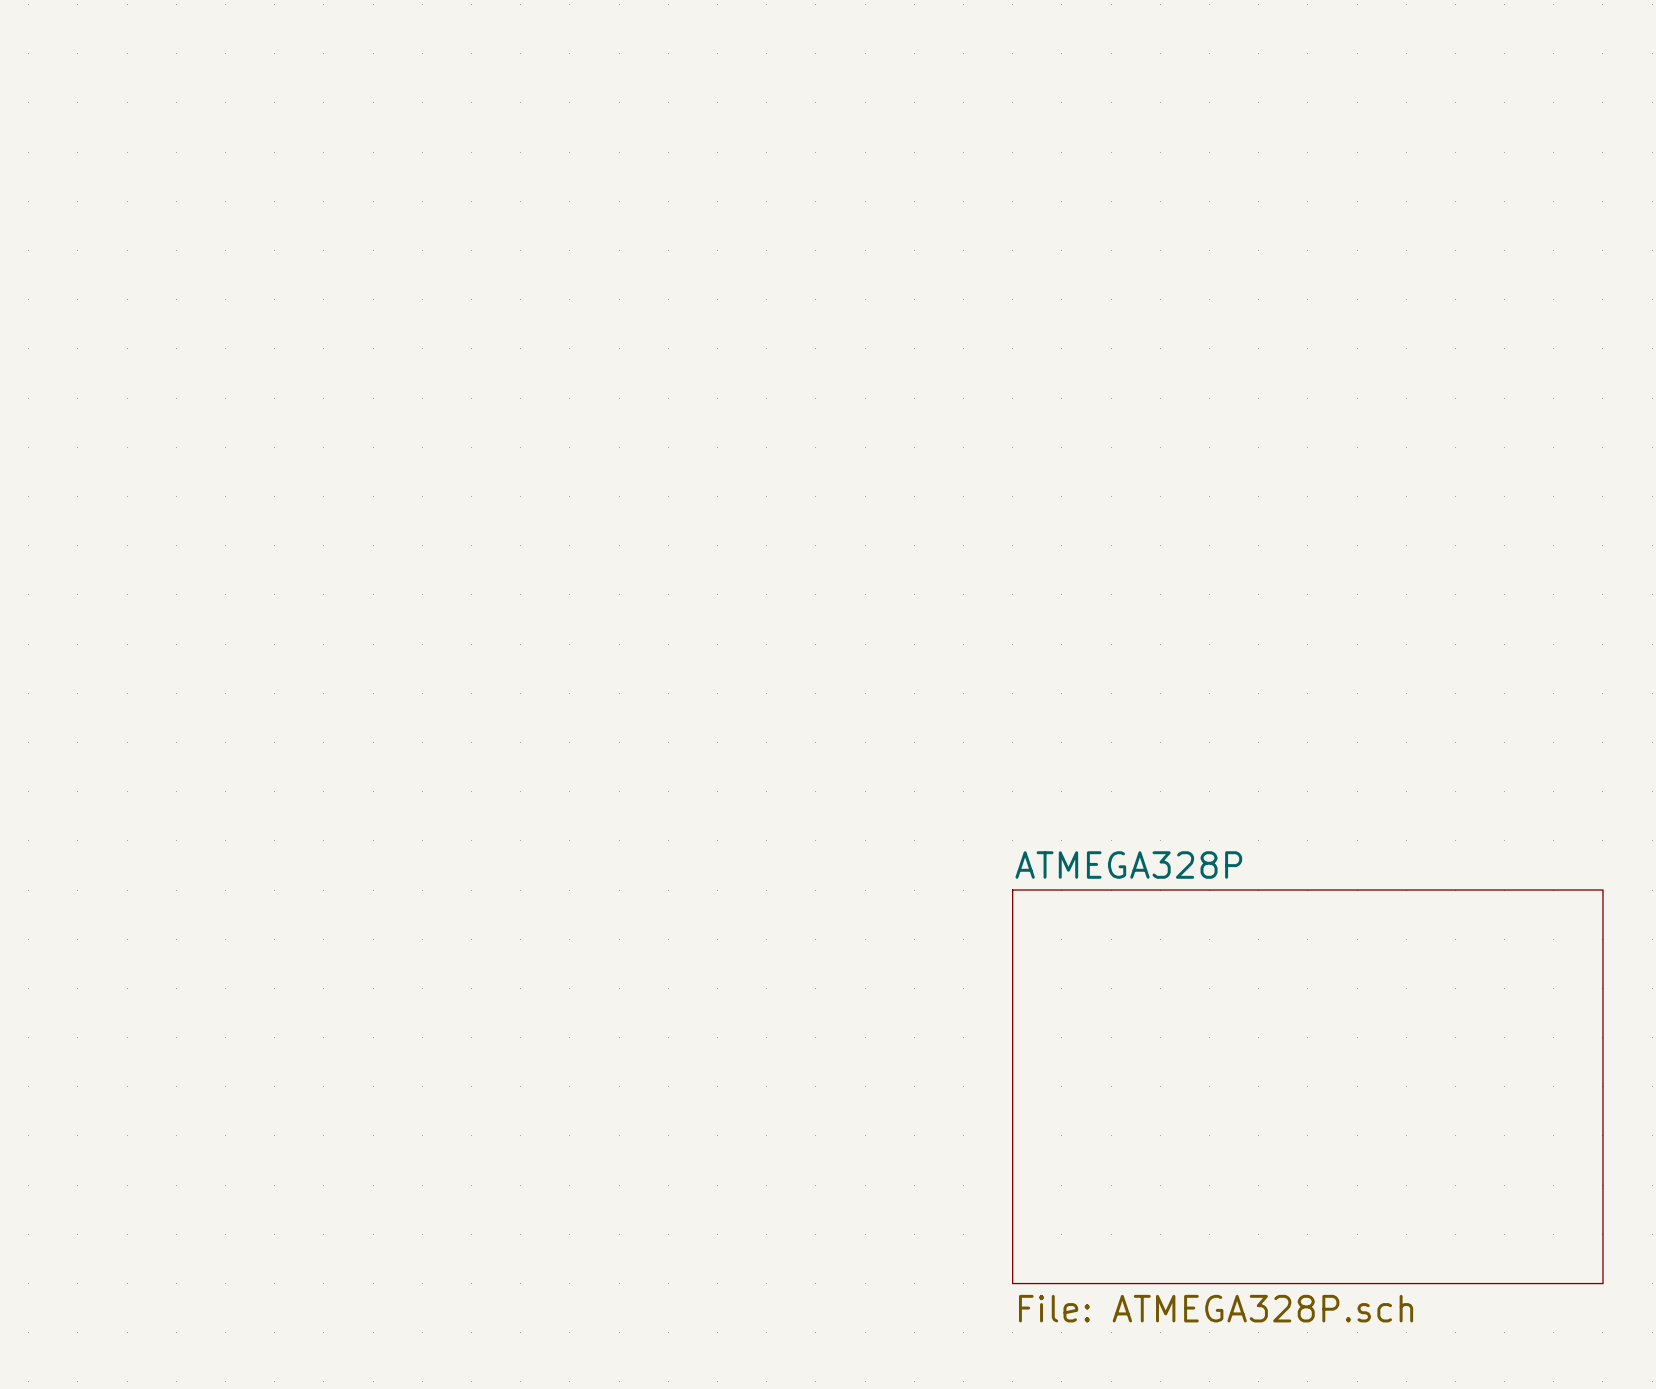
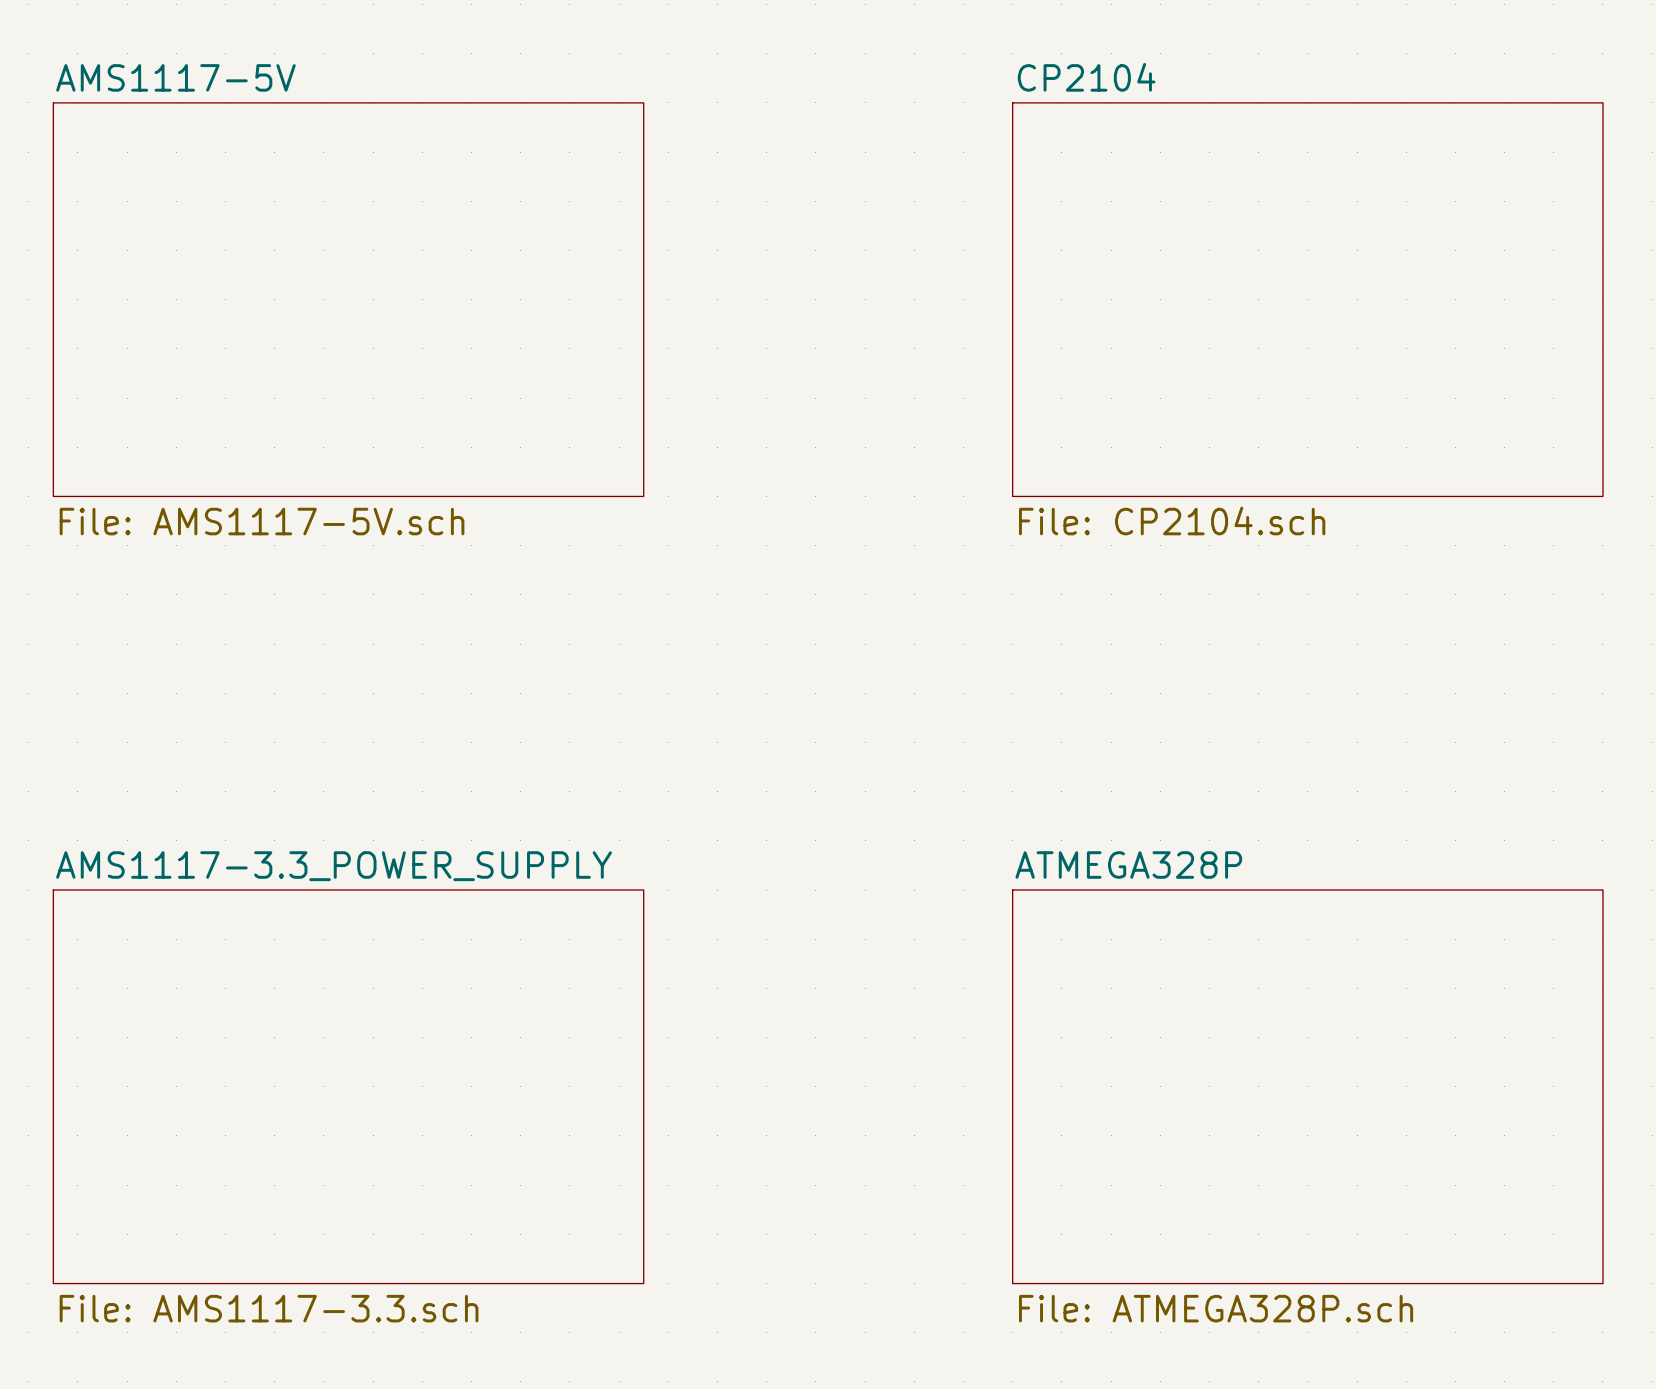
sheet AMS1117-5V: none -> File: AMS1117-5V.sch (348, 299)
sheet CP2104: none -> File: CP2104.sch (1307, 299)
sheet AMS1117-3.3_POWER_SUPPLY: none -> File: AMS1117-3.3.sch (348, 1086)

